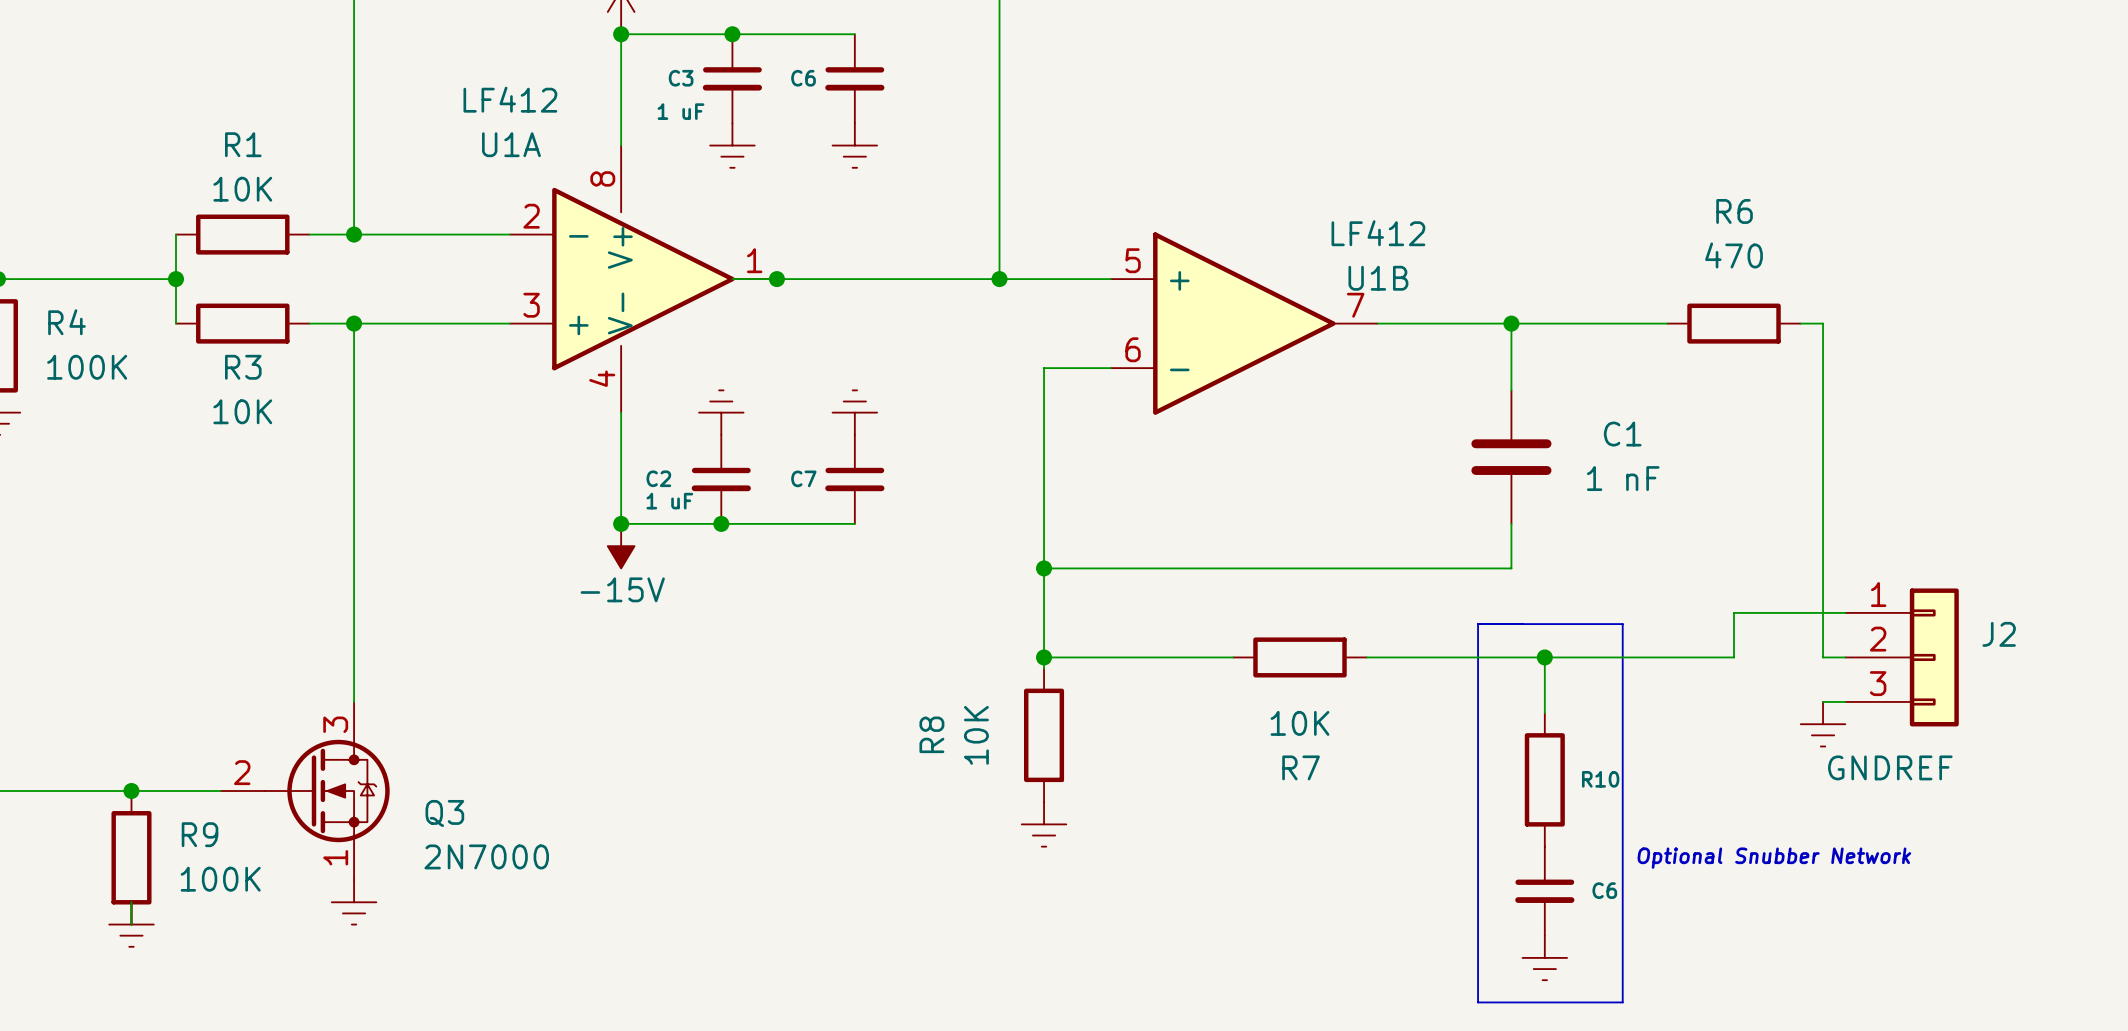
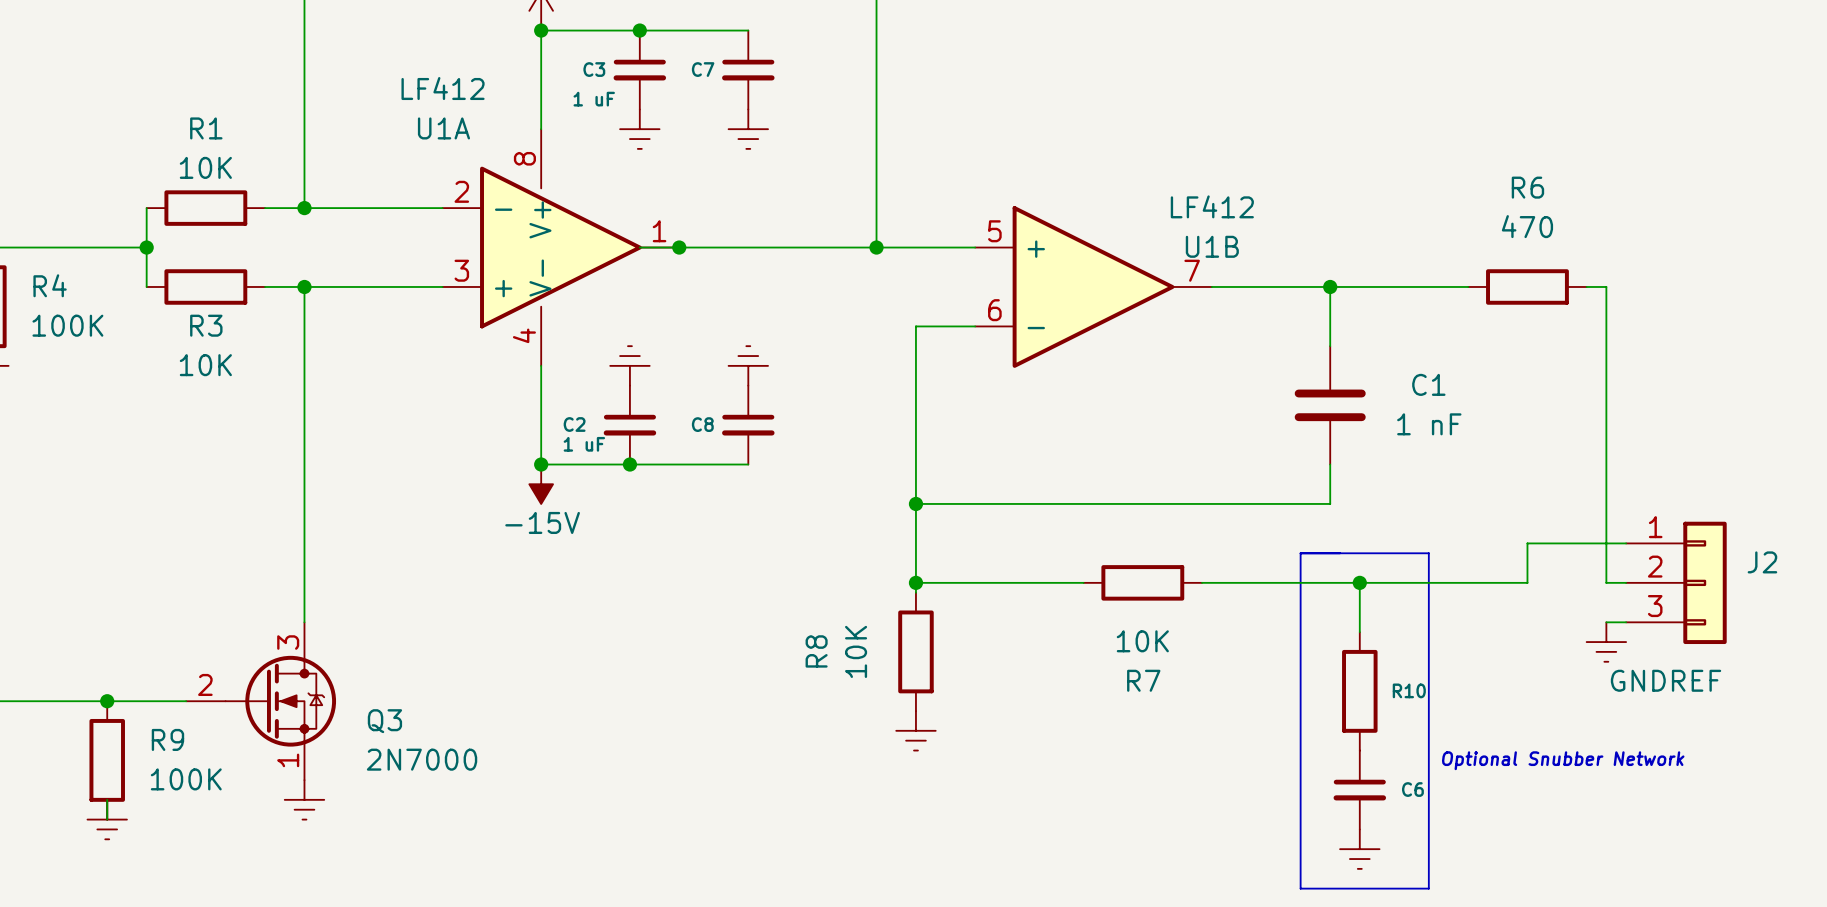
C6 name: C6 (803, 78) -> C7 (703, 69)
C7 name: C7 (803, 478) -> C8 (702, 424)

